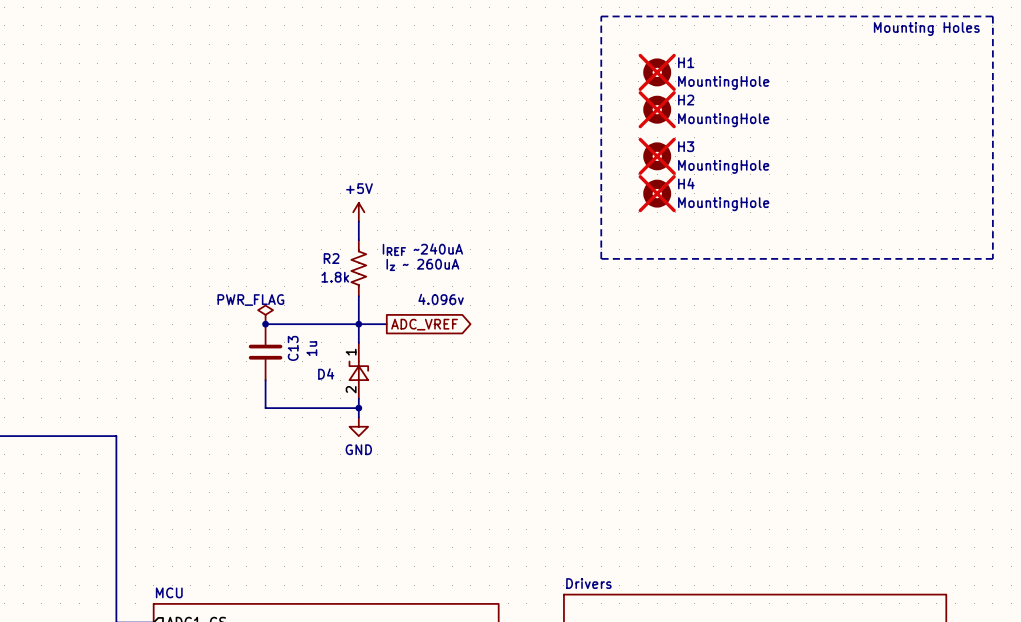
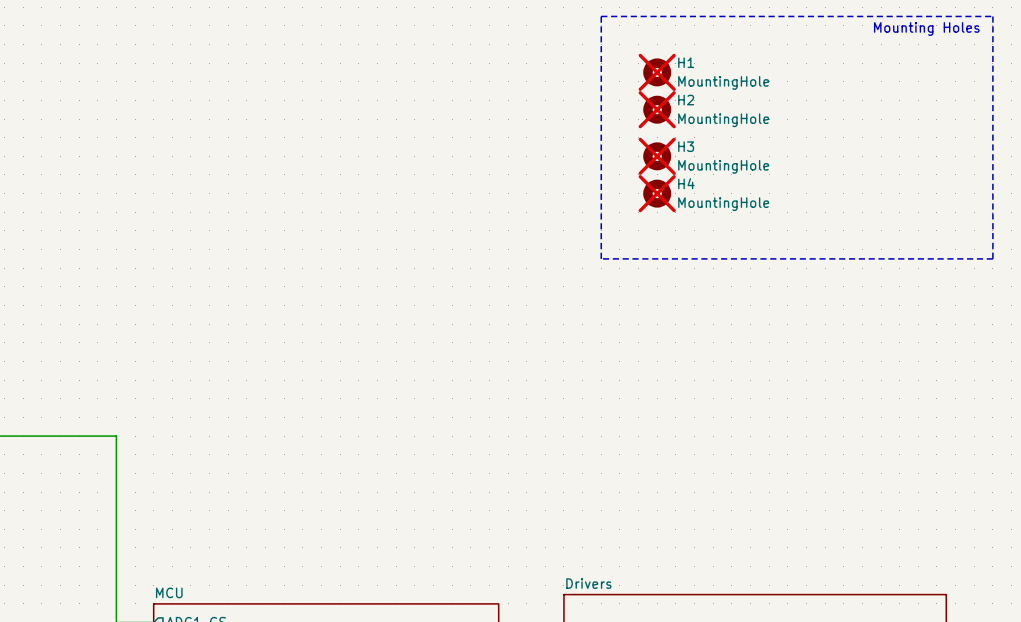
power symbol: +5V (358, 212) -> none
wire: (358, 221) (358, 240) -> none
text: IREF ~240uA (422, 249) -> none
text: Iz ~ 260uA (422, 264) -> none
R2: 1.8k (358, 268) -> none
wire: (358, 296) (358, 342) -> none
text: 4.096v (441, 299) -> none
power symbol: PWR_FLAG (265, 314) -> none
wire: (265, 324) (386, 324) -> none
junction: (265, 324) -> none
junction: (358, 324) -> none
global label: ADC_VREF (424, 324) -> none
C13: 1u (265, 352) -> none
D4: (358, 370) -> none
wire: (265, 380) (265, 408) (358, 408) -> none
wire: (358, 398) (358, 417) -> none
junction: (358, 408) -> none
power symbol: GND (358, 426) -> none

